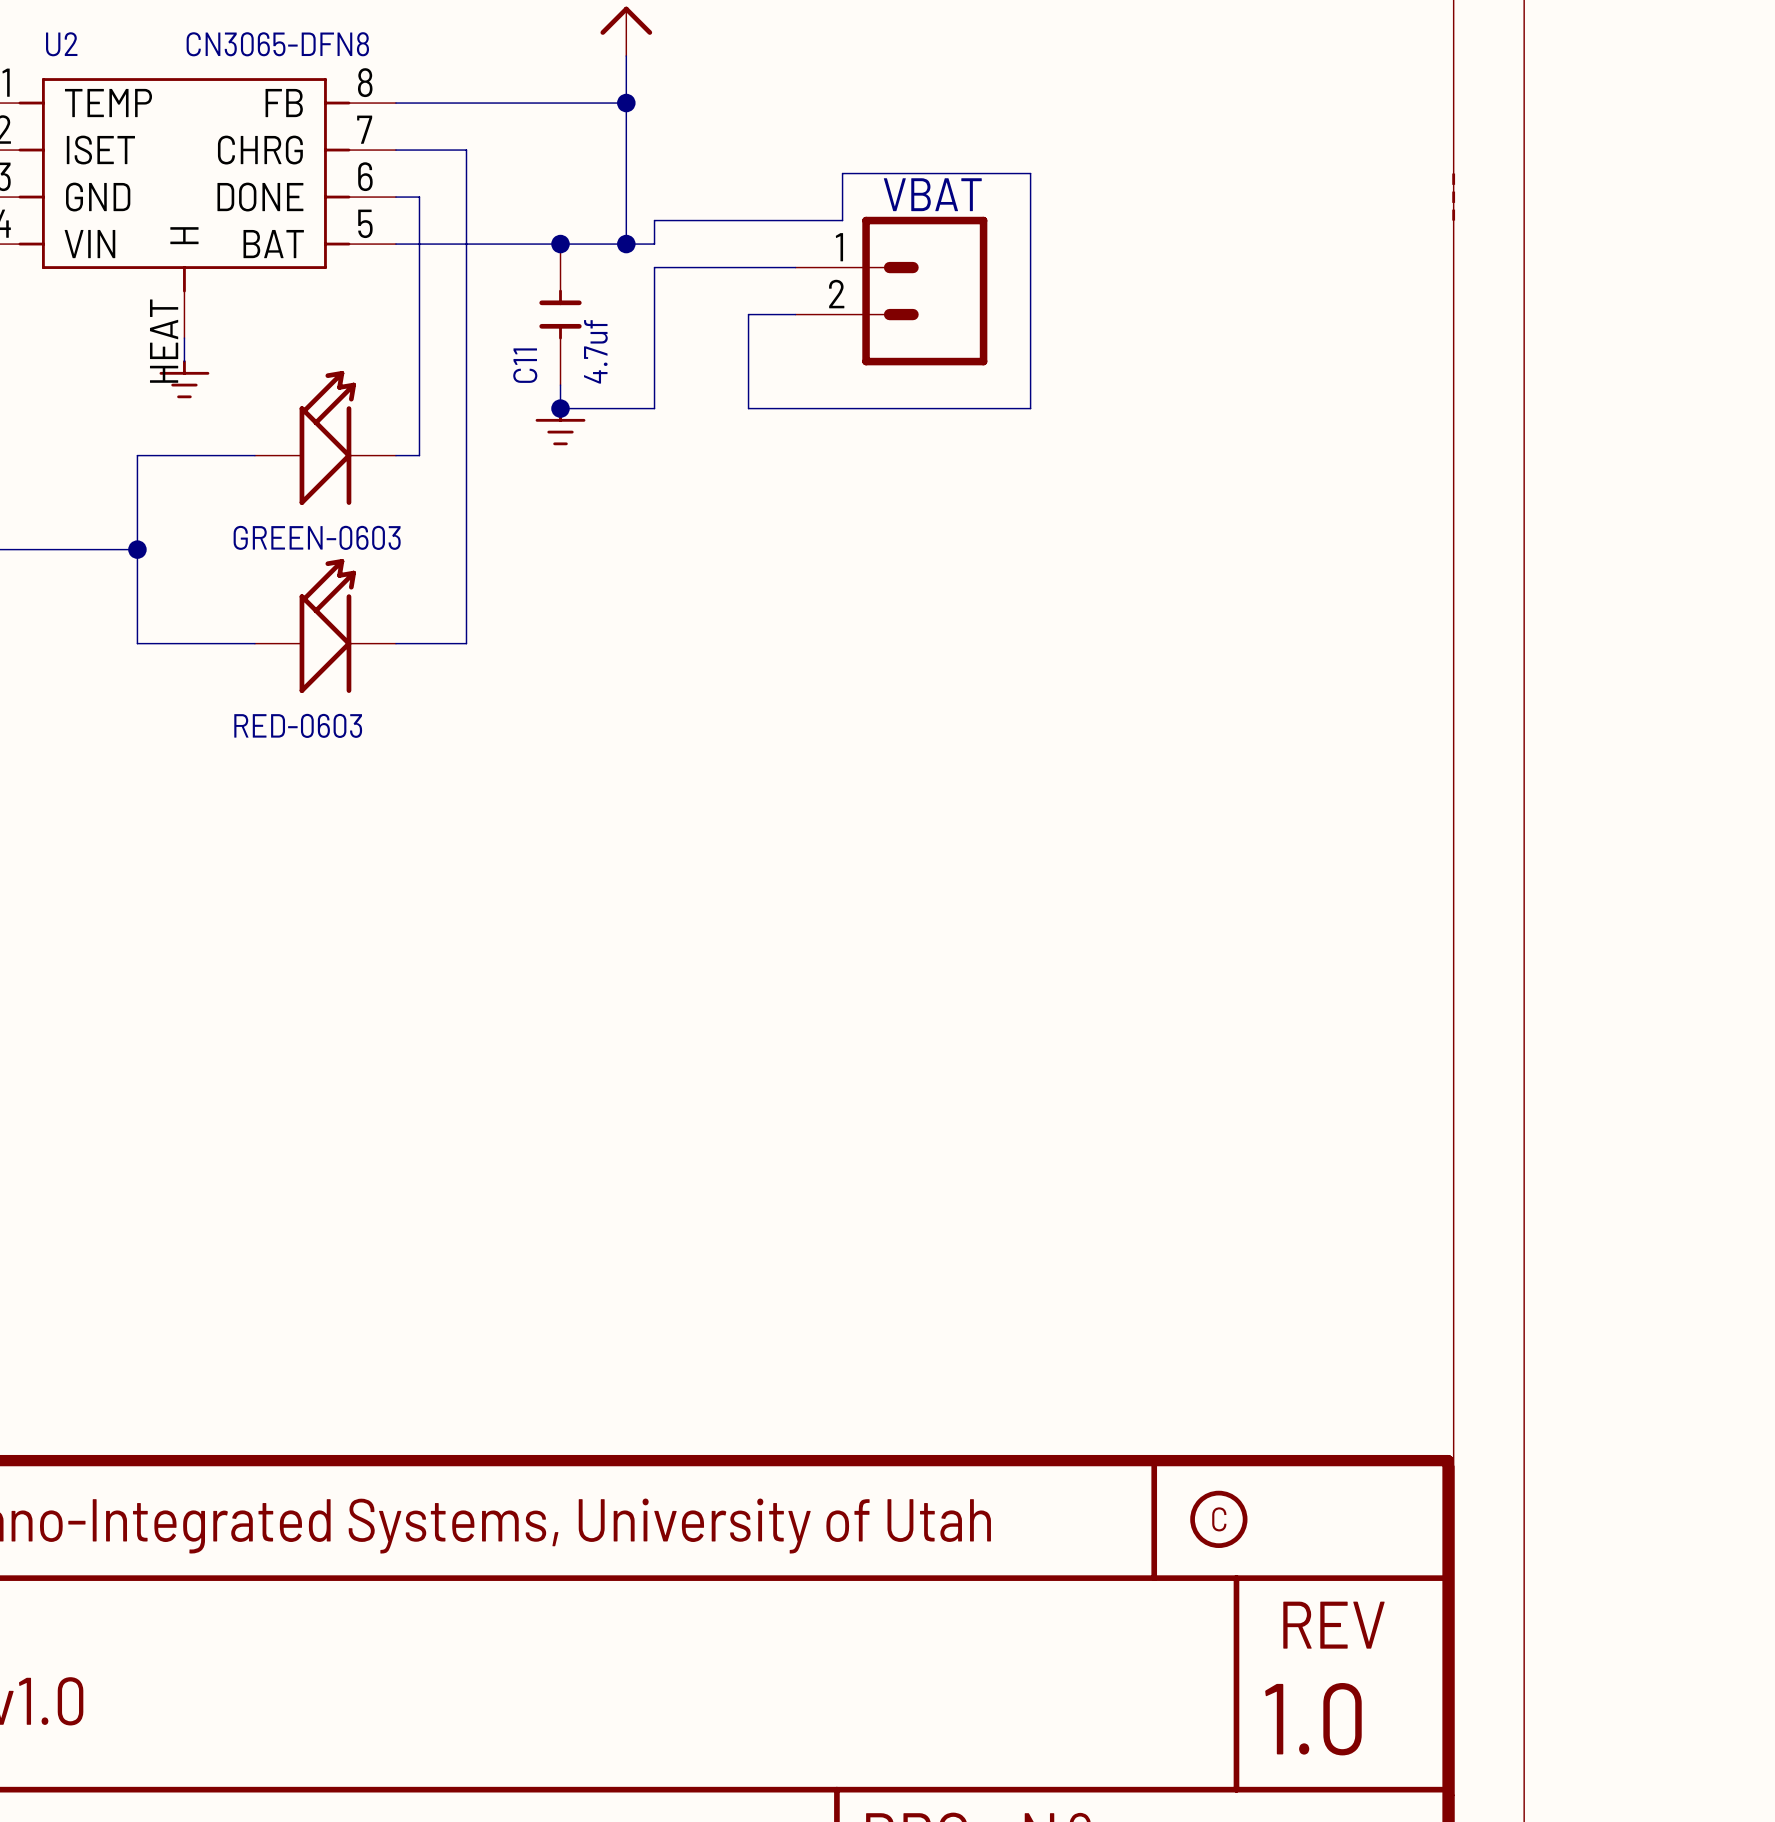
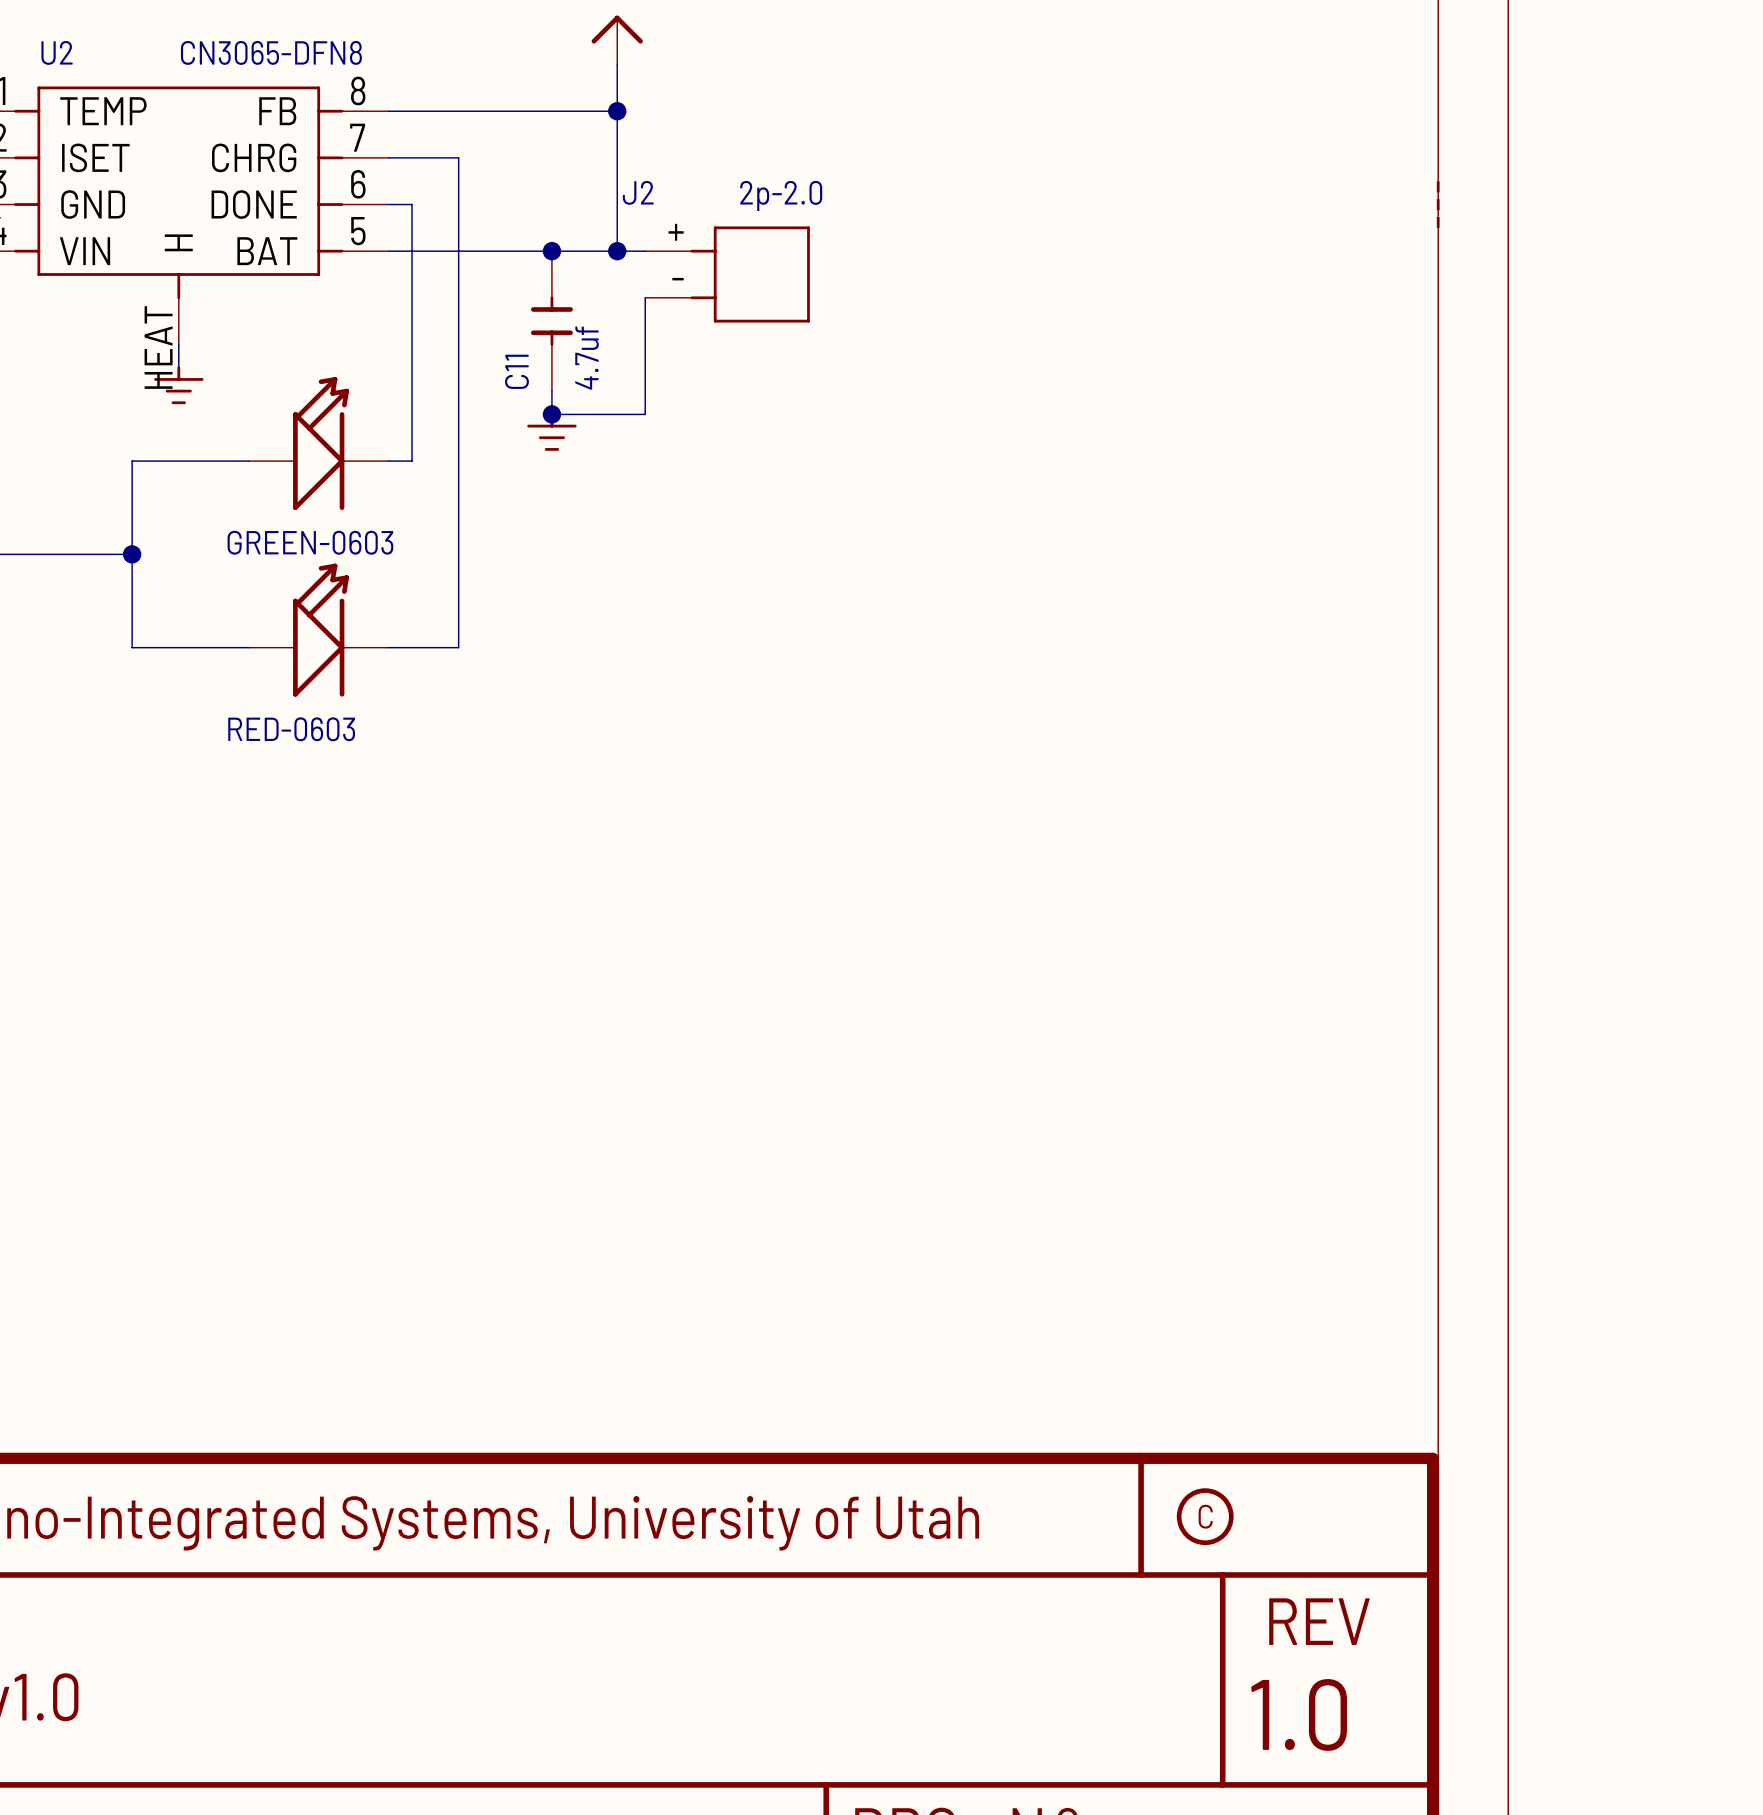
wire: (654, 244) (654, 220) (842, 220) (842, 173) (1030, 173) (1030, 408) (748, 408) (748, 314) (795, 314) -> none
J2: none -> 2p-2.0 (727, 274)
wire: (795, 267) (654, 267) (654, 291) -> none
VBAT: (891, 291) -> none

